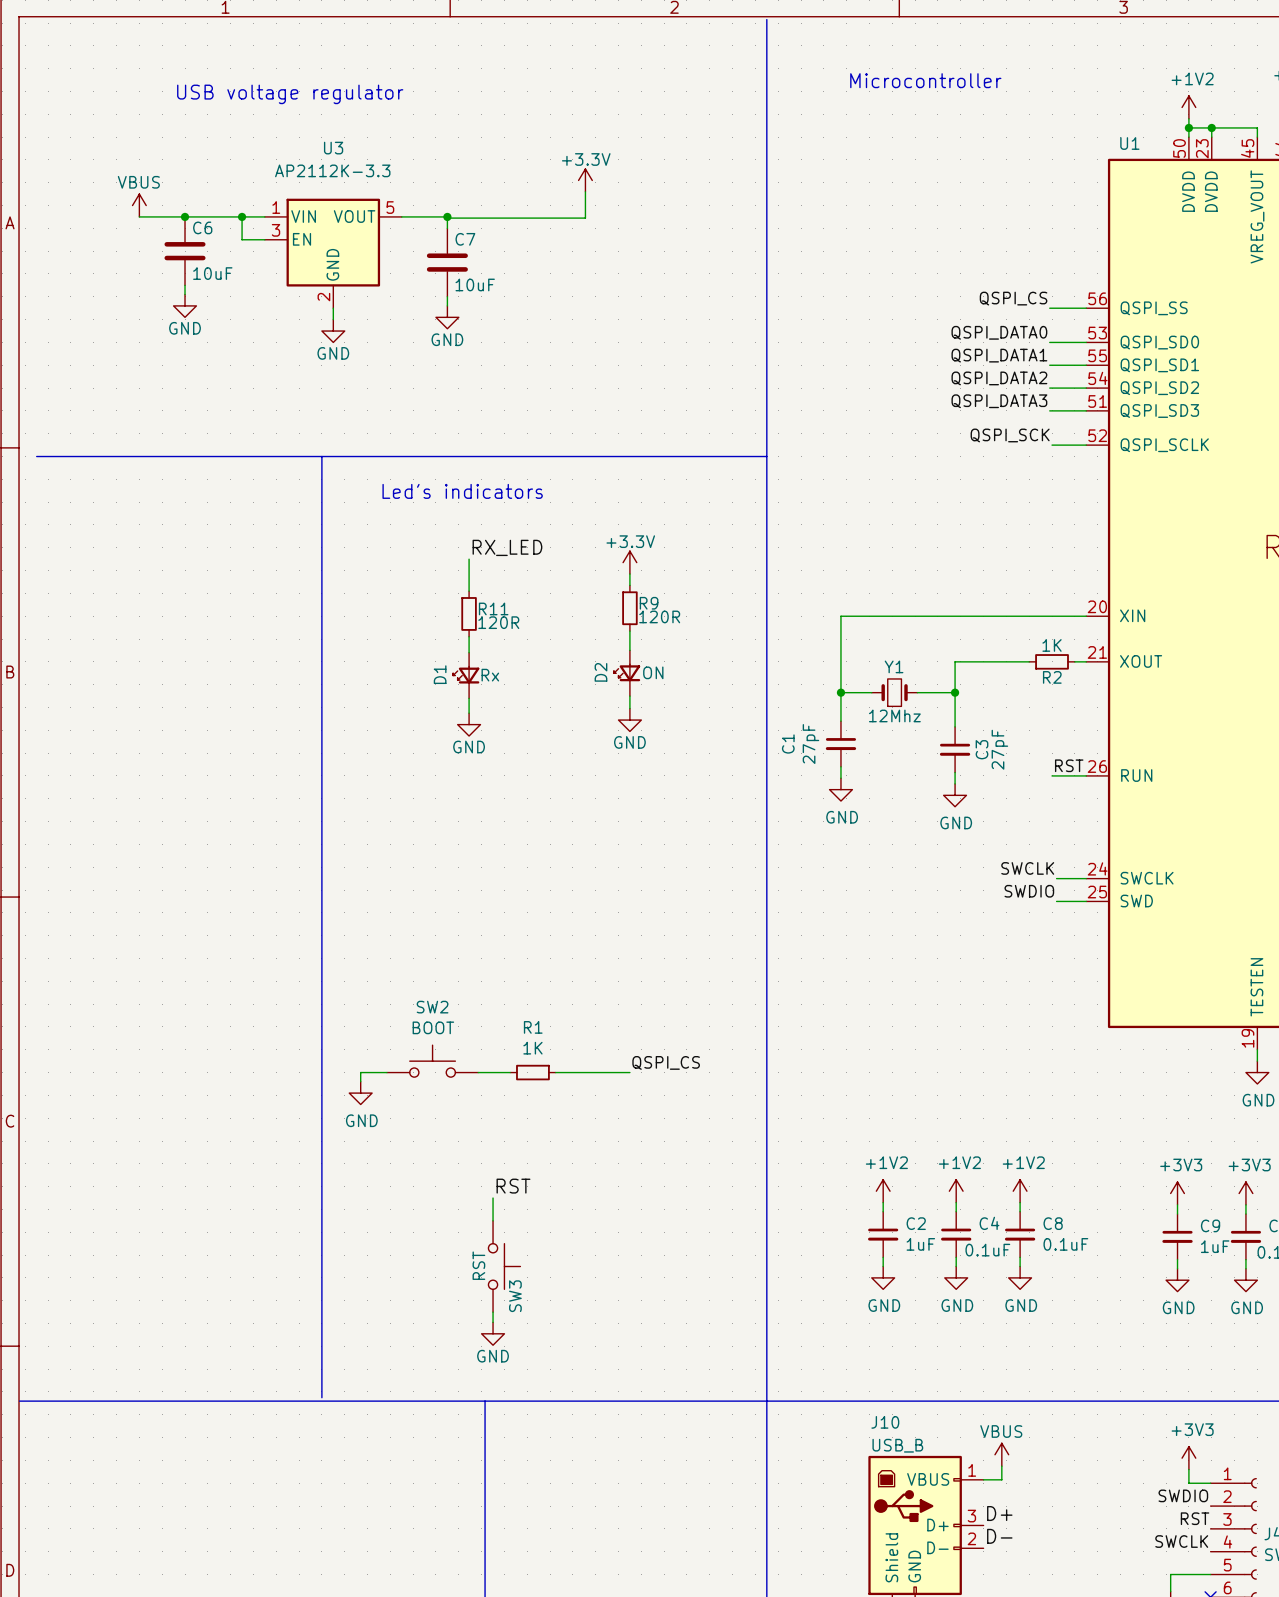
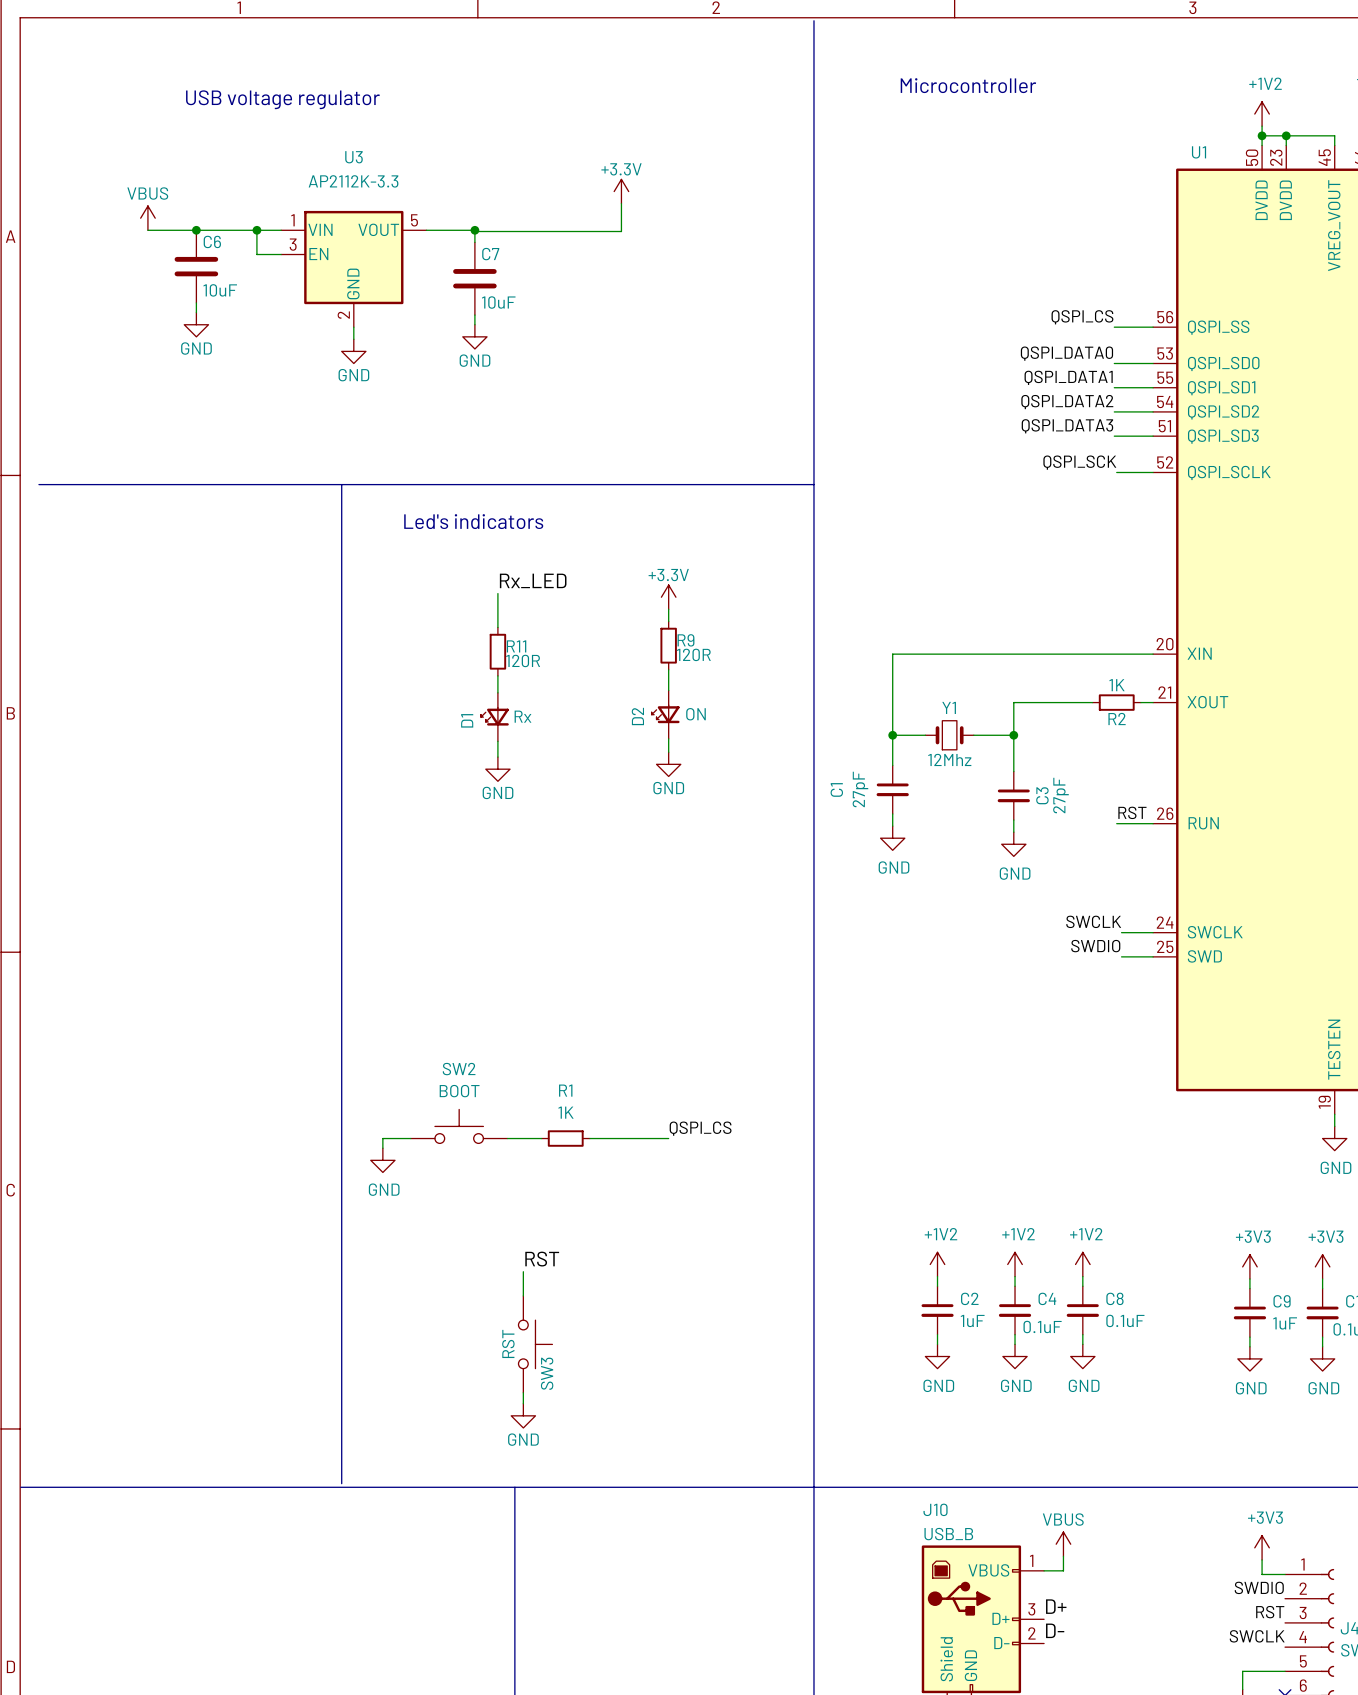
label: RX_LED (507, 547) -> Rx_LED (533, 580)

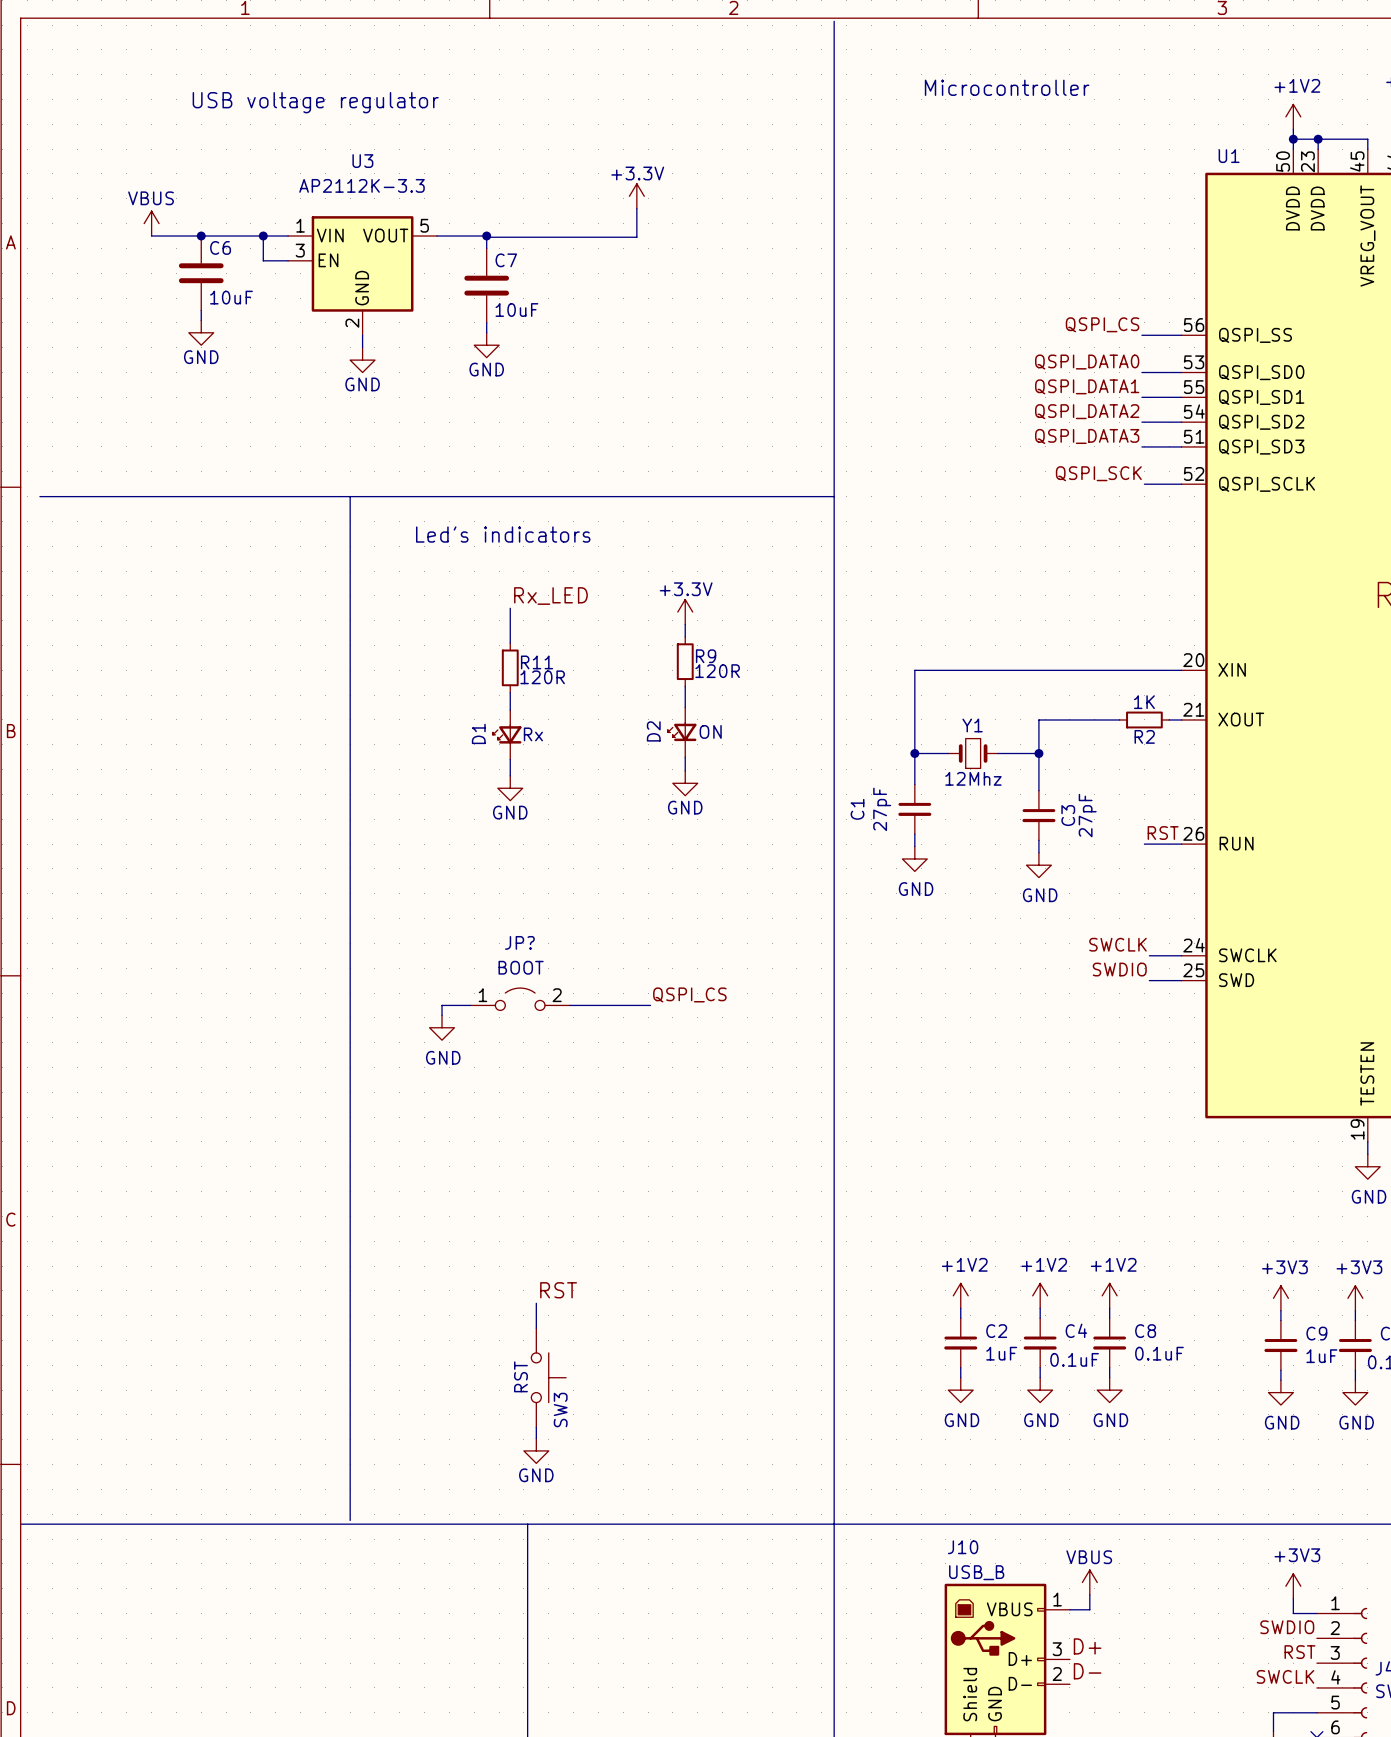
JP?: none -> BOOT (520, 999)
SW2: BOOT (459, 1126) -> none
label position: QSPI_CS (700, 1128) -> QSPI_CS (689, 994)
wire: (410, 1138) (382, 1138) (382, 1148) -> (470, 1005) (442, 1005) (442, 1015)
wire: (507, 1138) (541, 1138) -> none
R1: 1K (565, 1138) -> none
wire: (589, 1138) (668, 1138) -> (569, 1005) (650, 1005)
power symbol position: GND (382, 1160) -> GND (442, 1027)

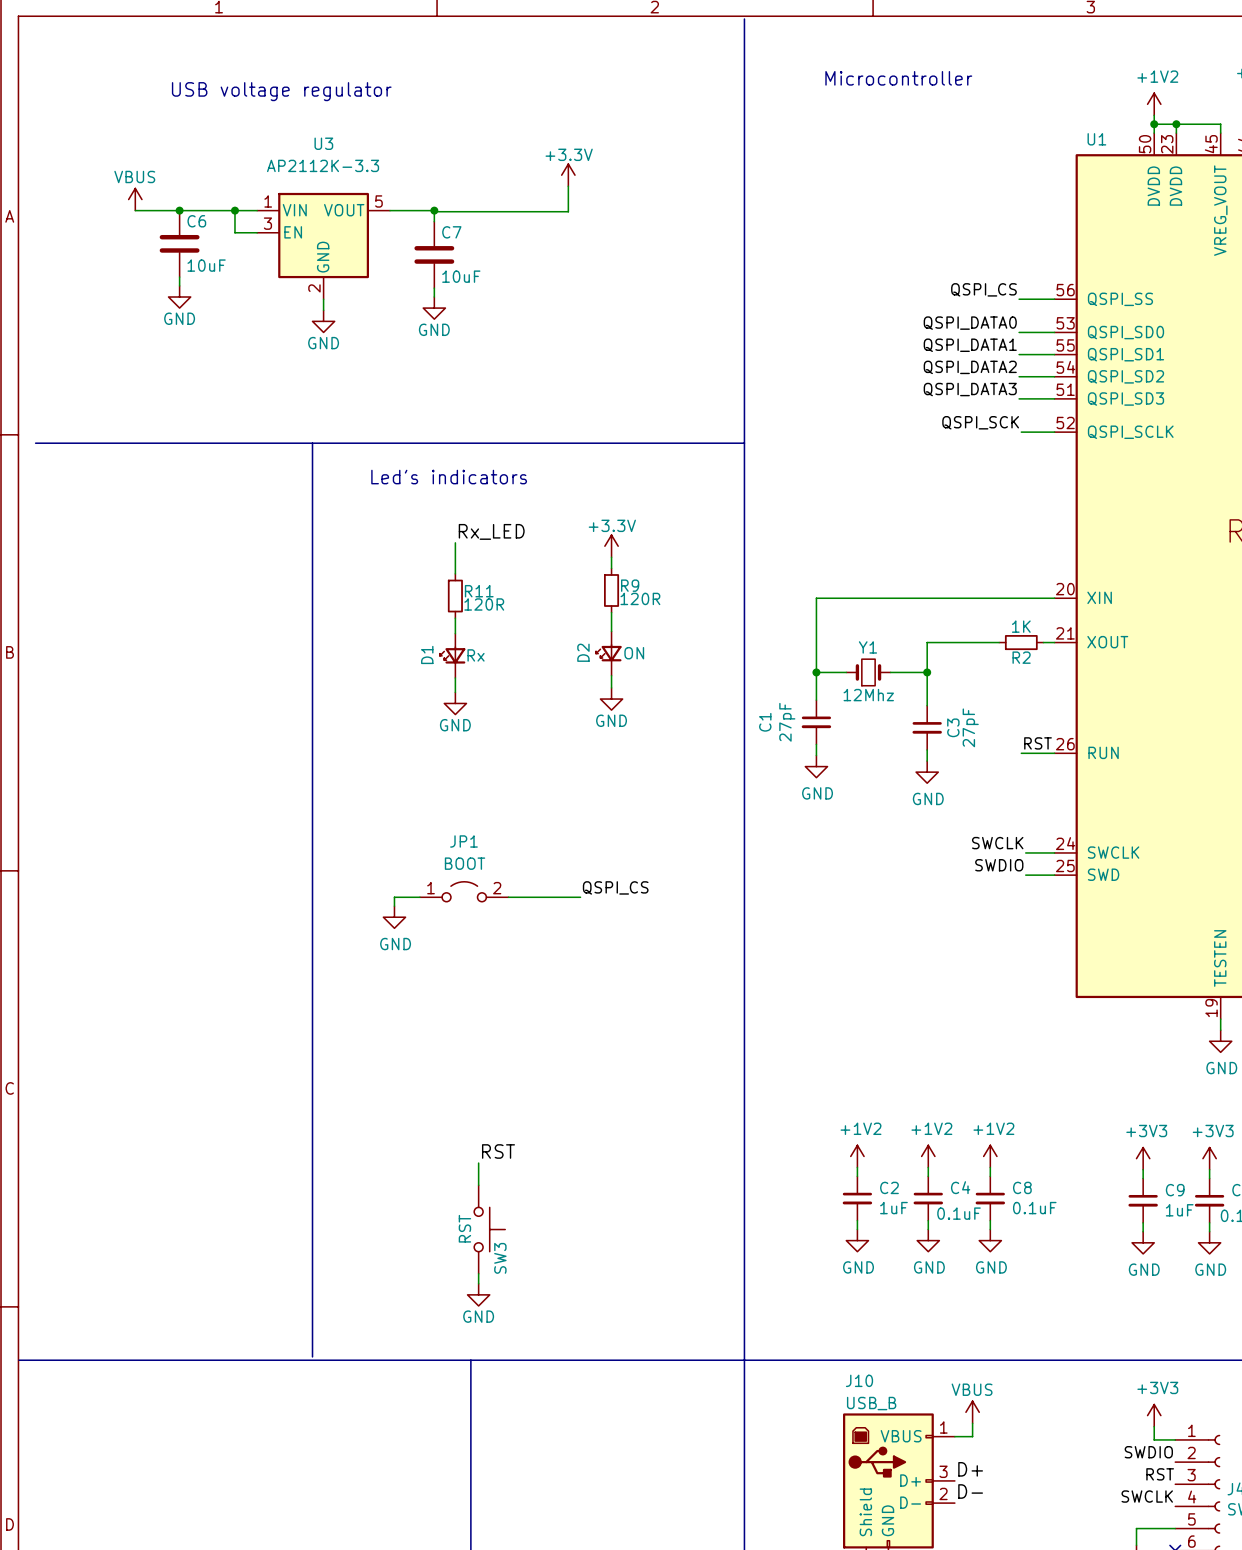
JP? name: JP? (519, 942) -> JP1 (463, 841)

